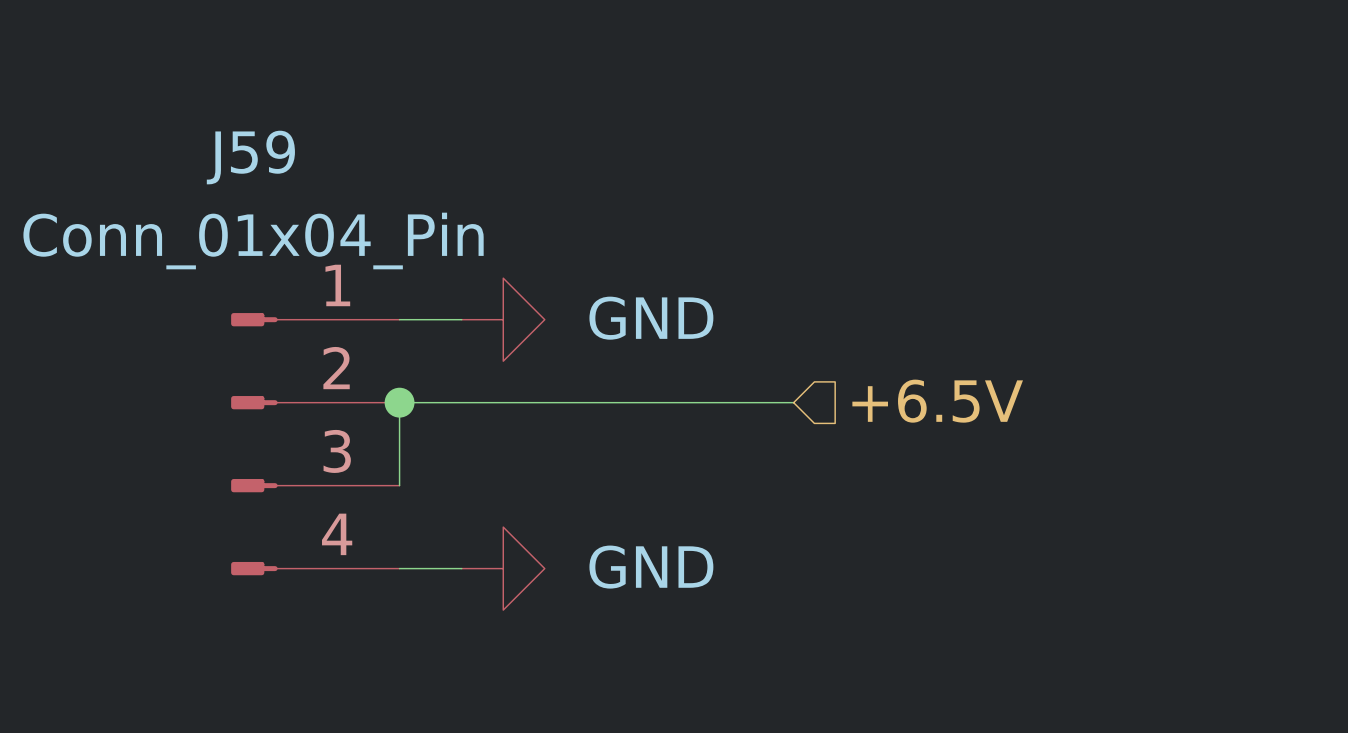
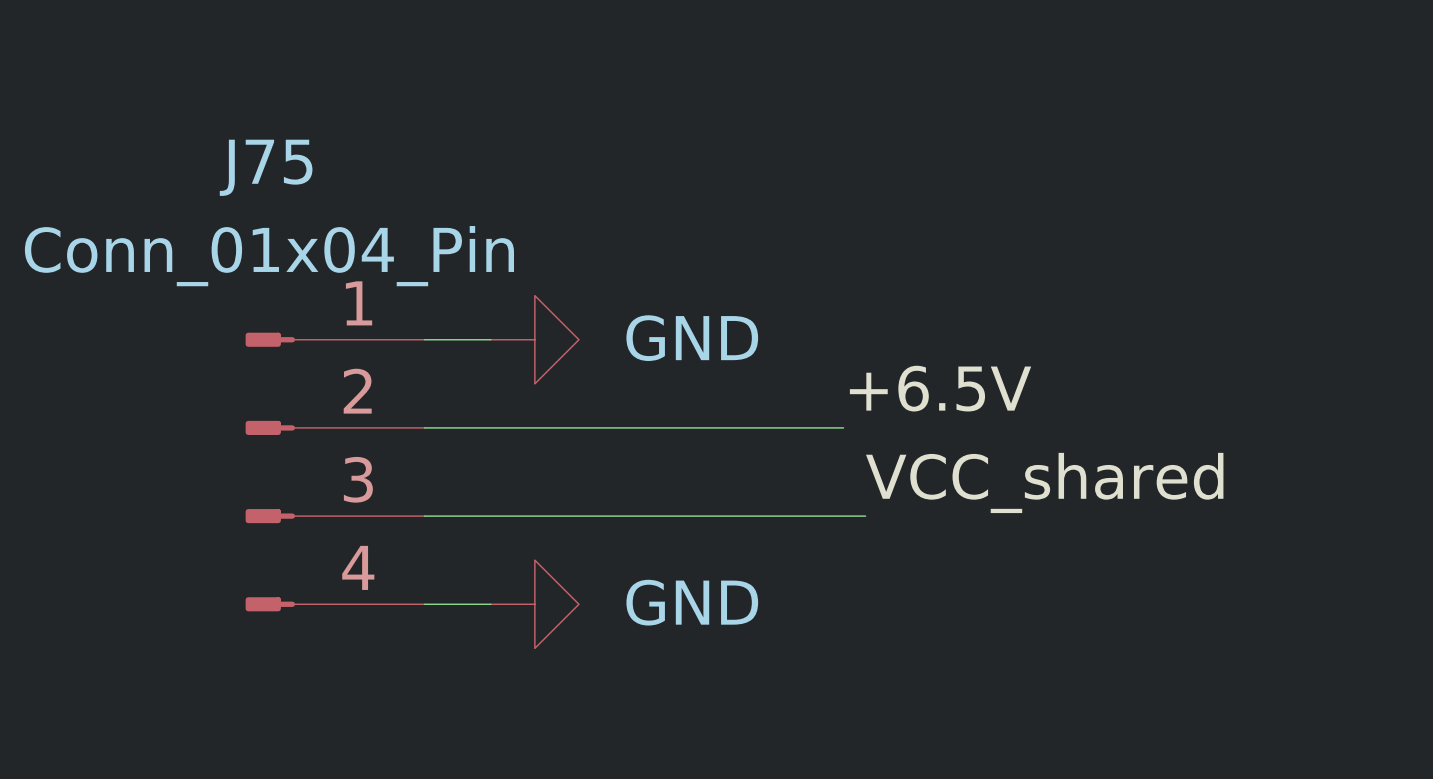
J59 name: J59 (250, 157) -> J75 (266, 167)
label: none -> +6.5V (940, 388)
hierarchical label: +6.5V (937, 401) -> none
wire: (399, 402) (399, 485) -> (865, 516) (424, 516)
junction: (399, 402) -> none
label: none -> VCC_shared (1044, 482)

